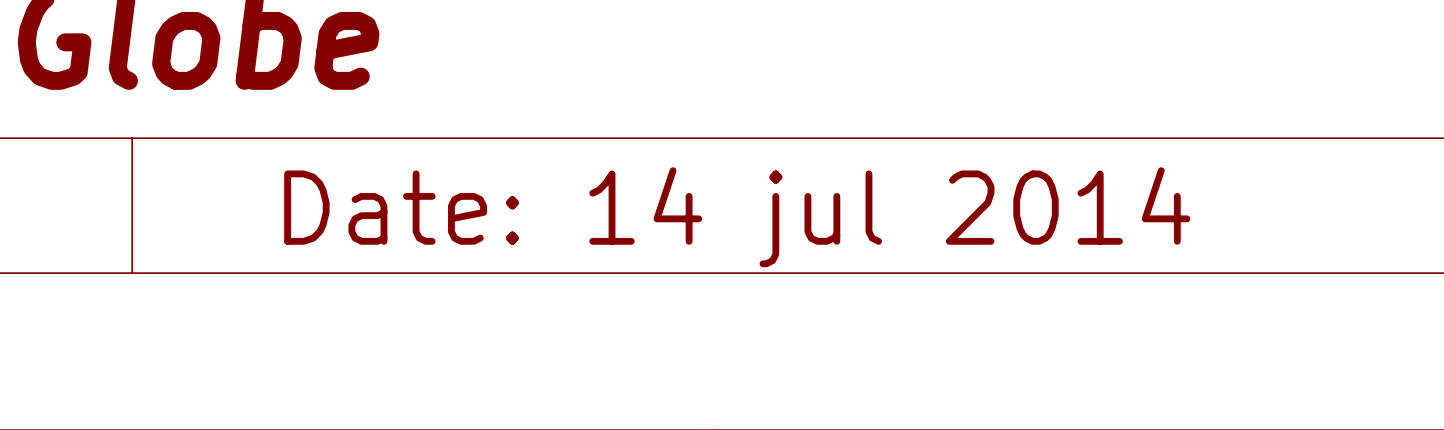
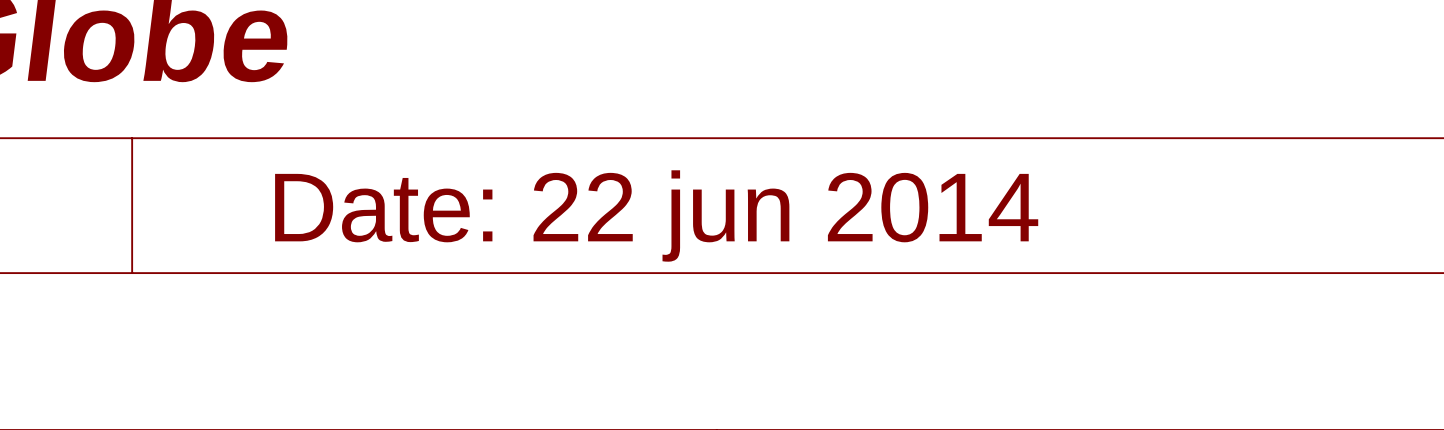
title block: Date: 14 jul 2014 (737, 217) -> Date: 22 jun 2014 (656, 215)

